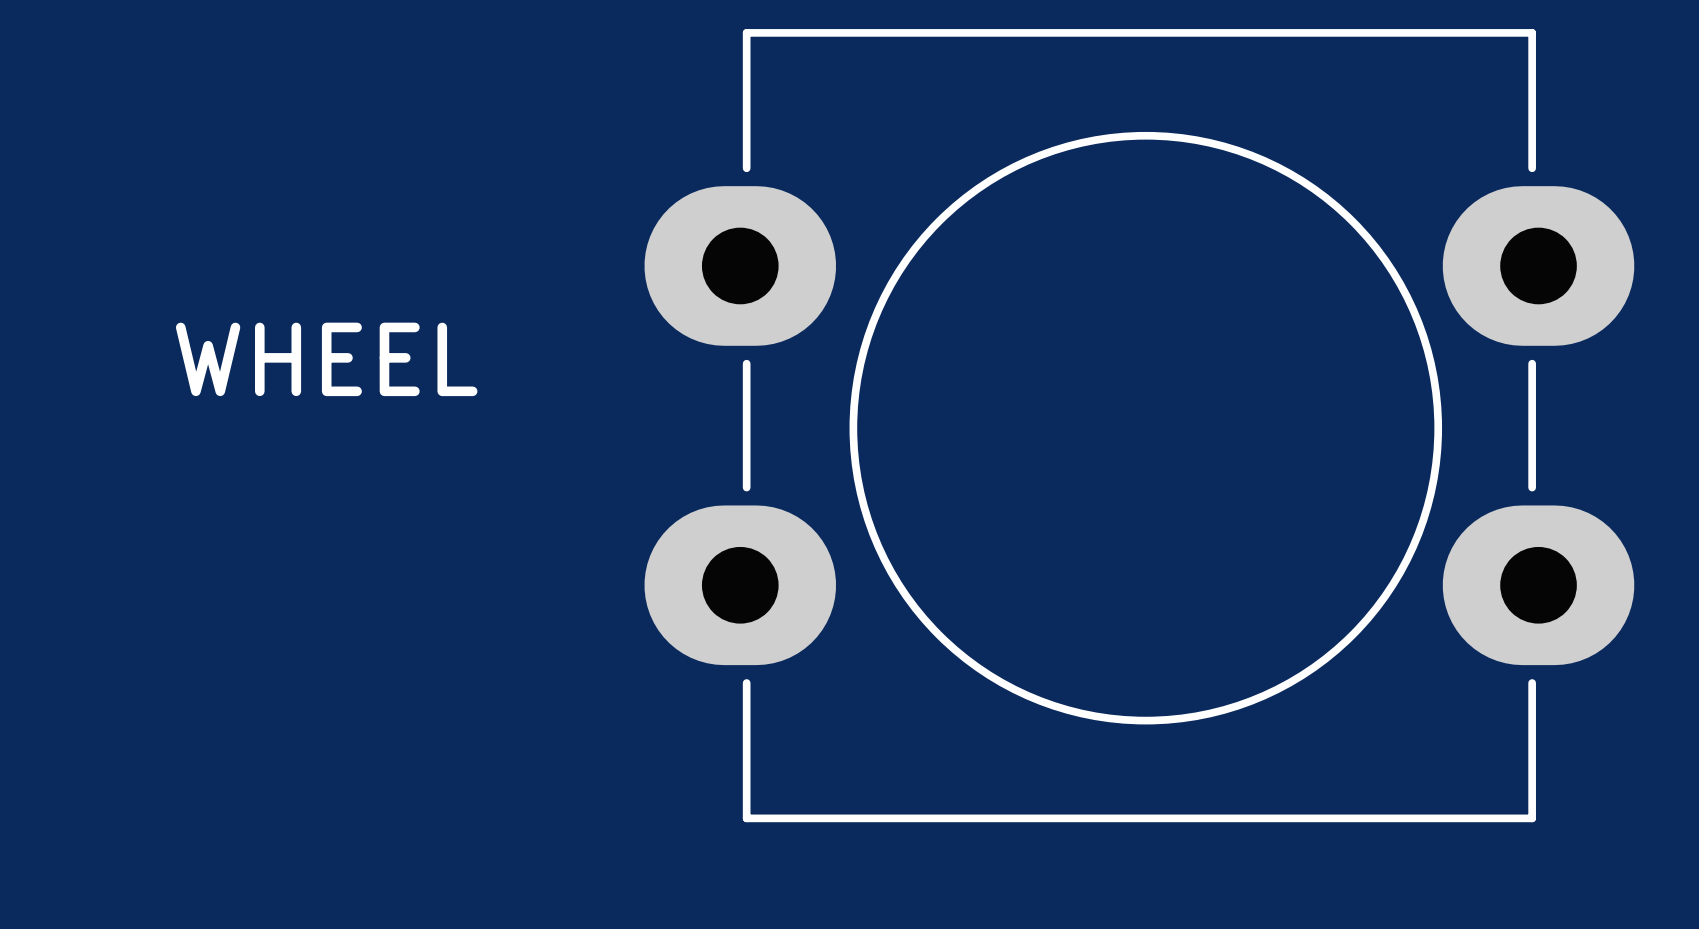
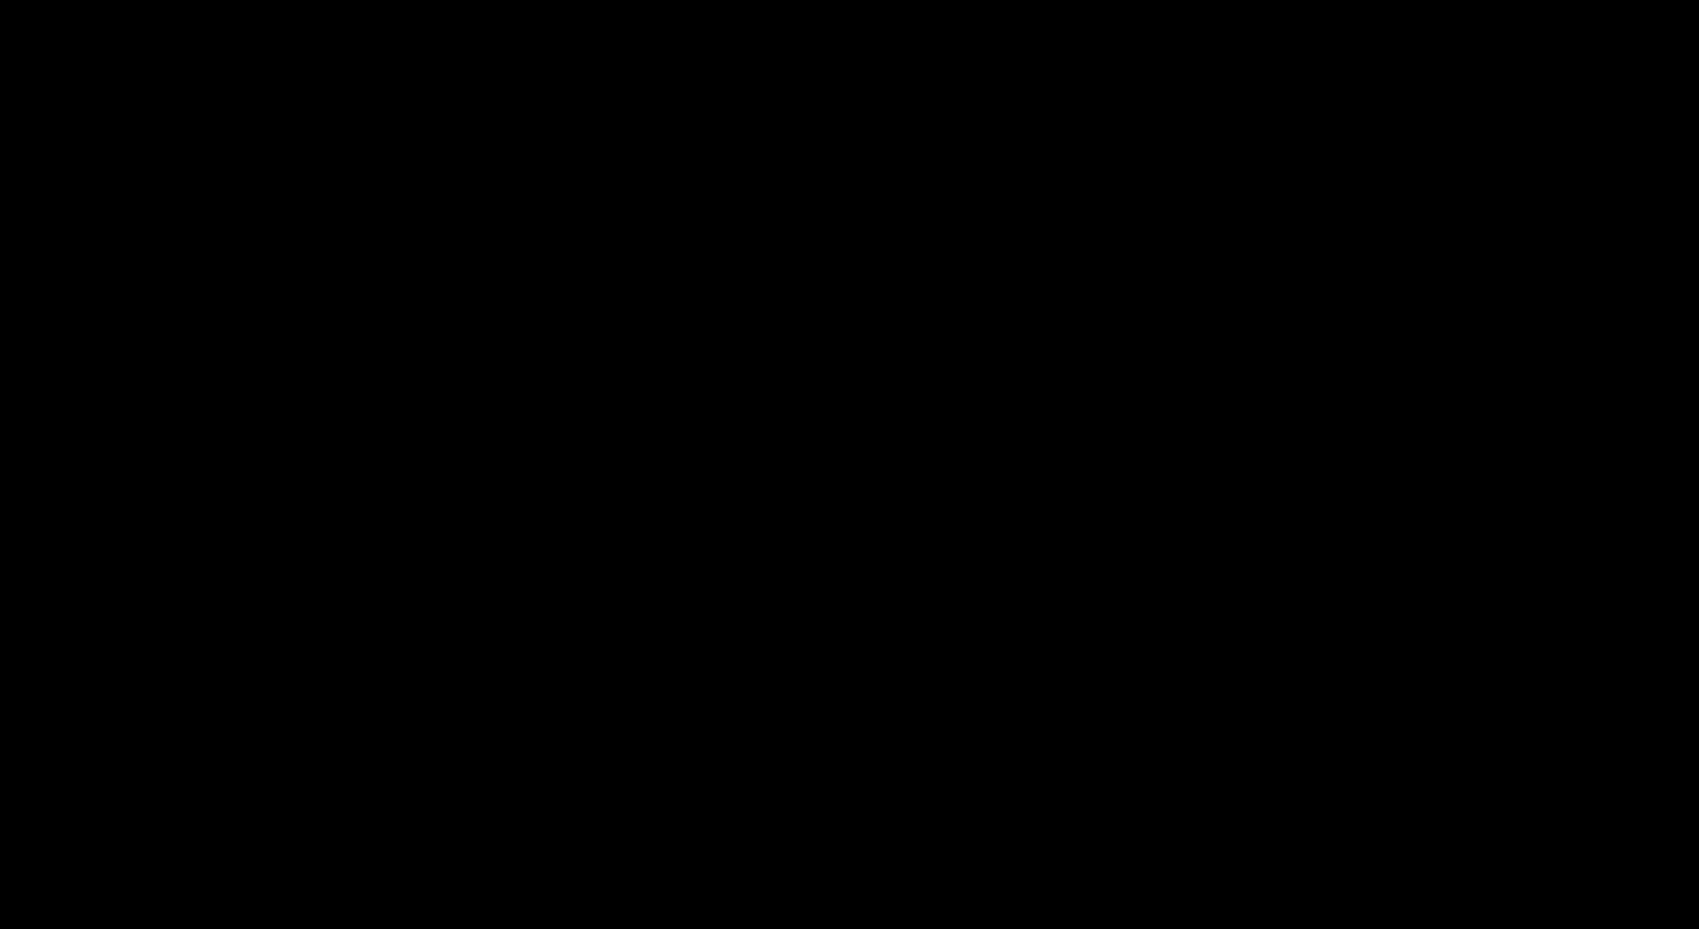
WHEEL: (1139, 425) -> none

